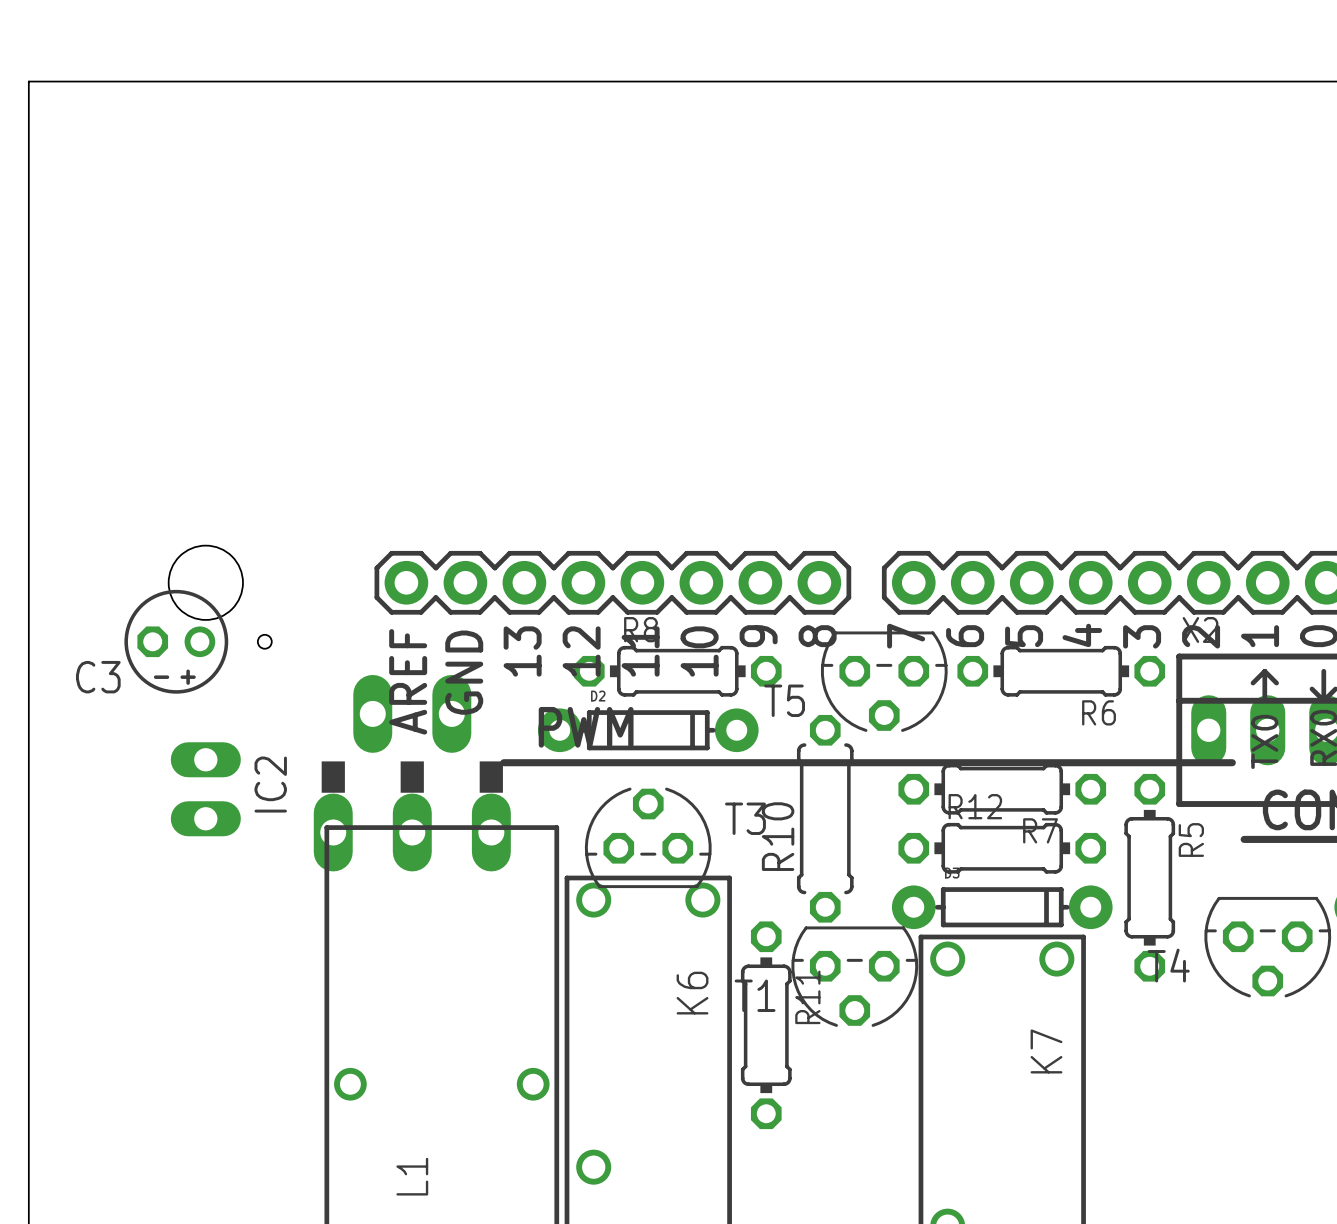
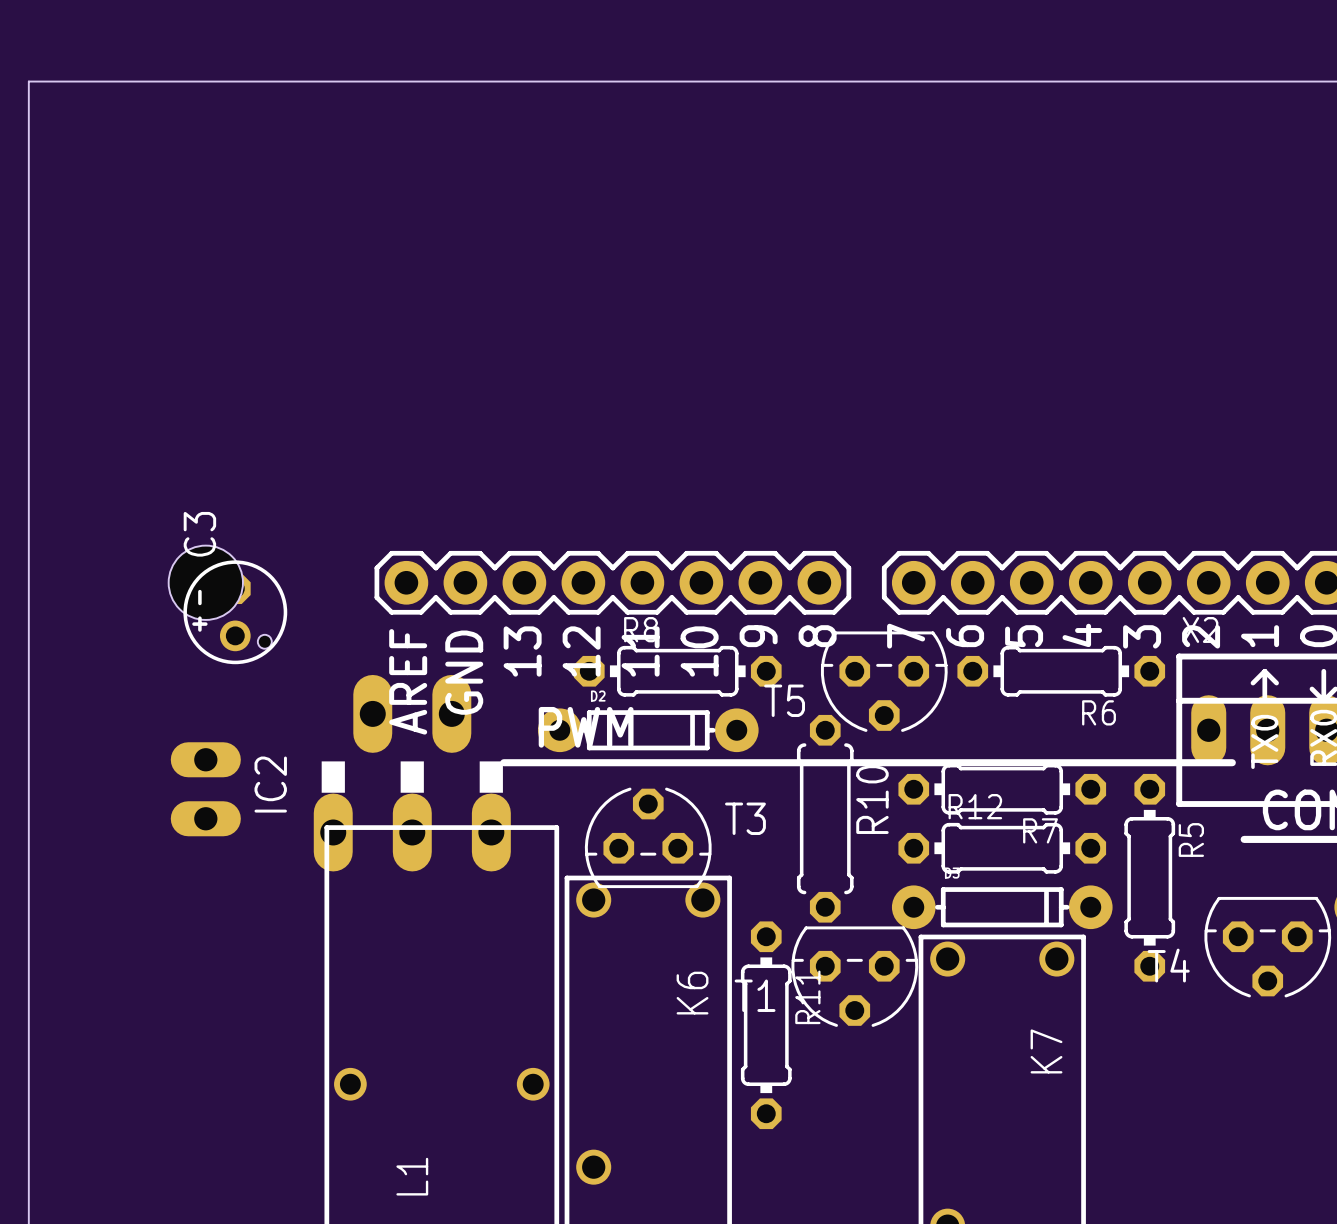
C3 rotation: 0° (176, 641) -> 90° clockwise (235, 612)
C3 position: (176, 641) -> (235, 612)
R10 name position: R10 (778, 836) -> R10 (872, 799)

